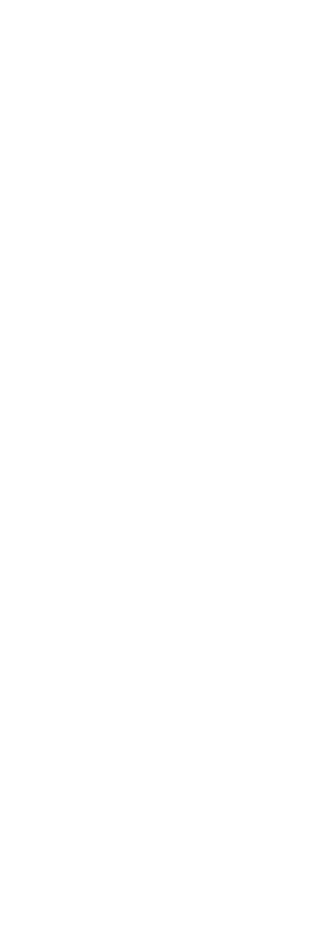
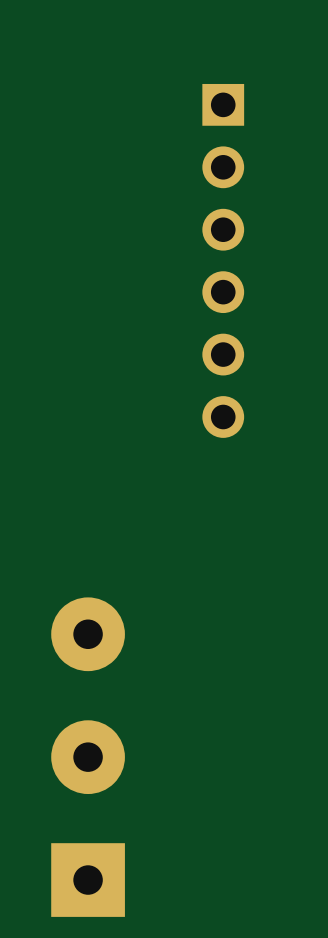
part: none -> (223, 260)
part: none -> (88, 757)

